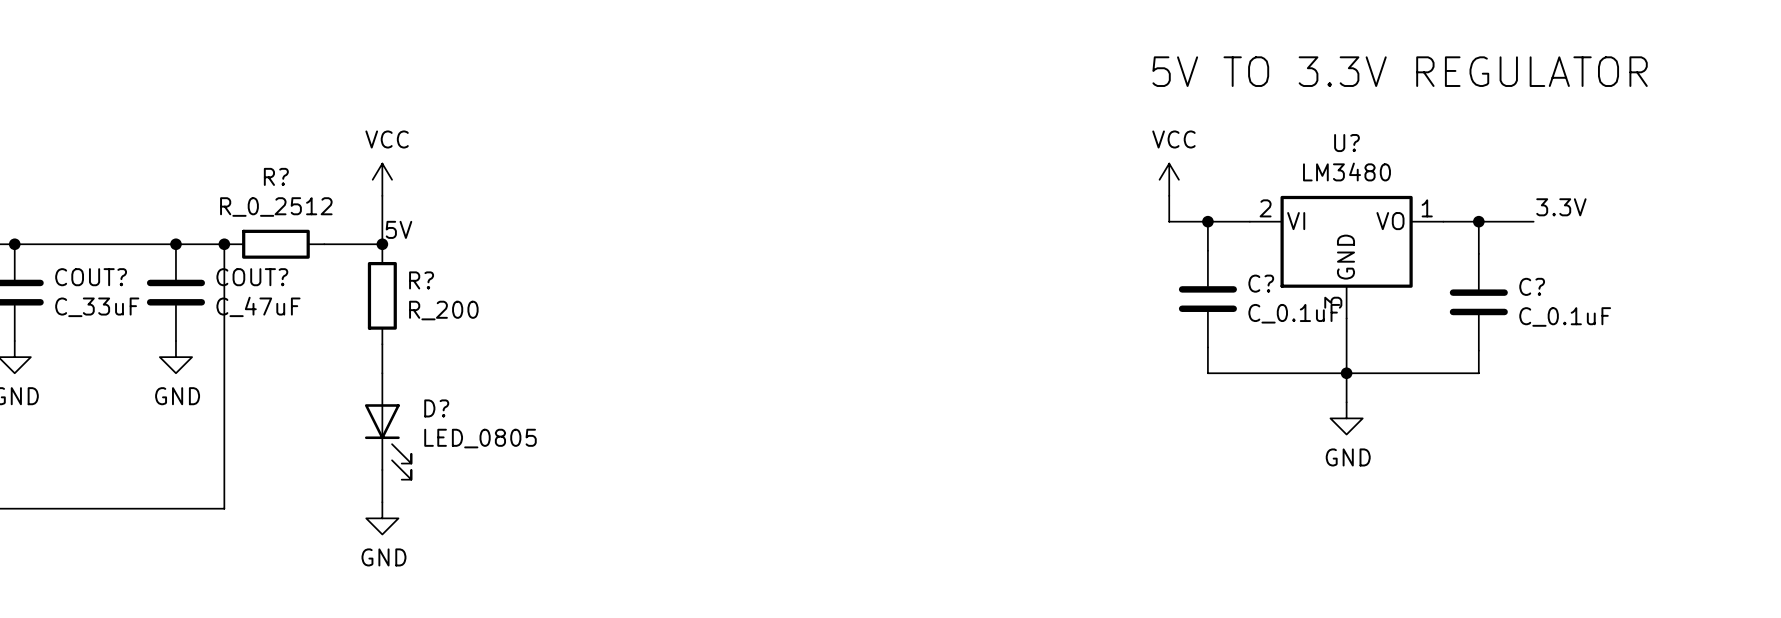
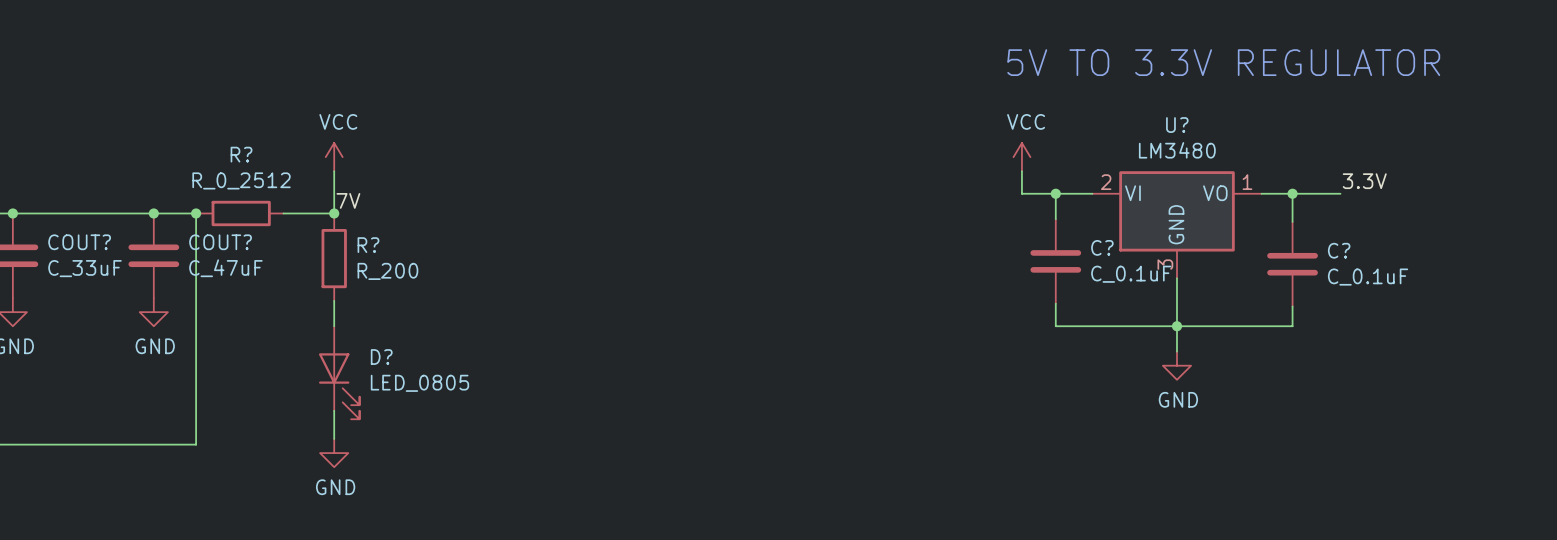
label: 5V (398, 229) -> 7V (348, 200)

